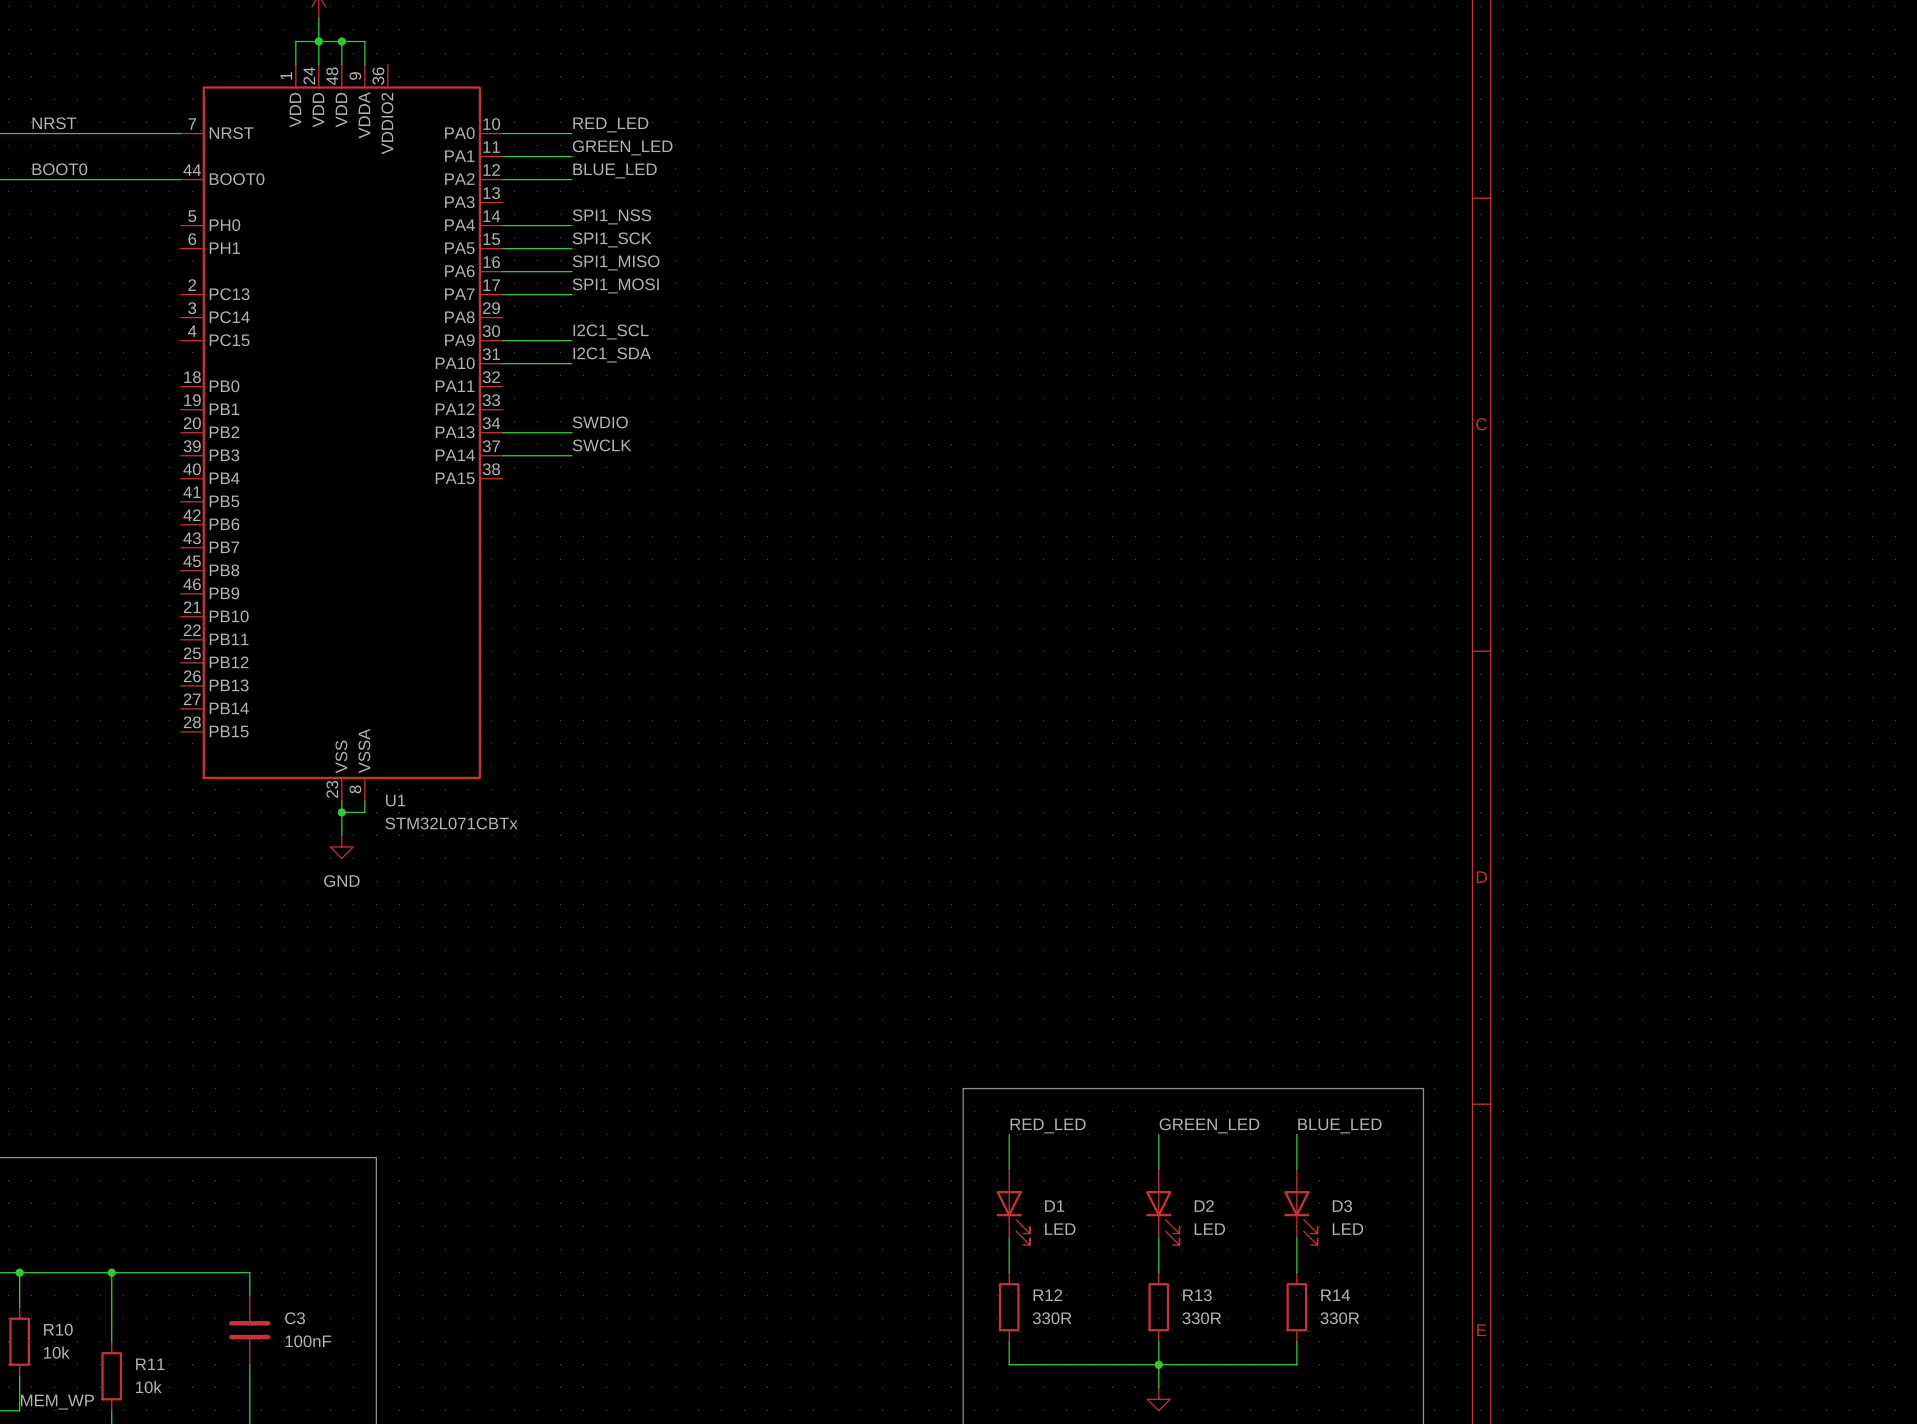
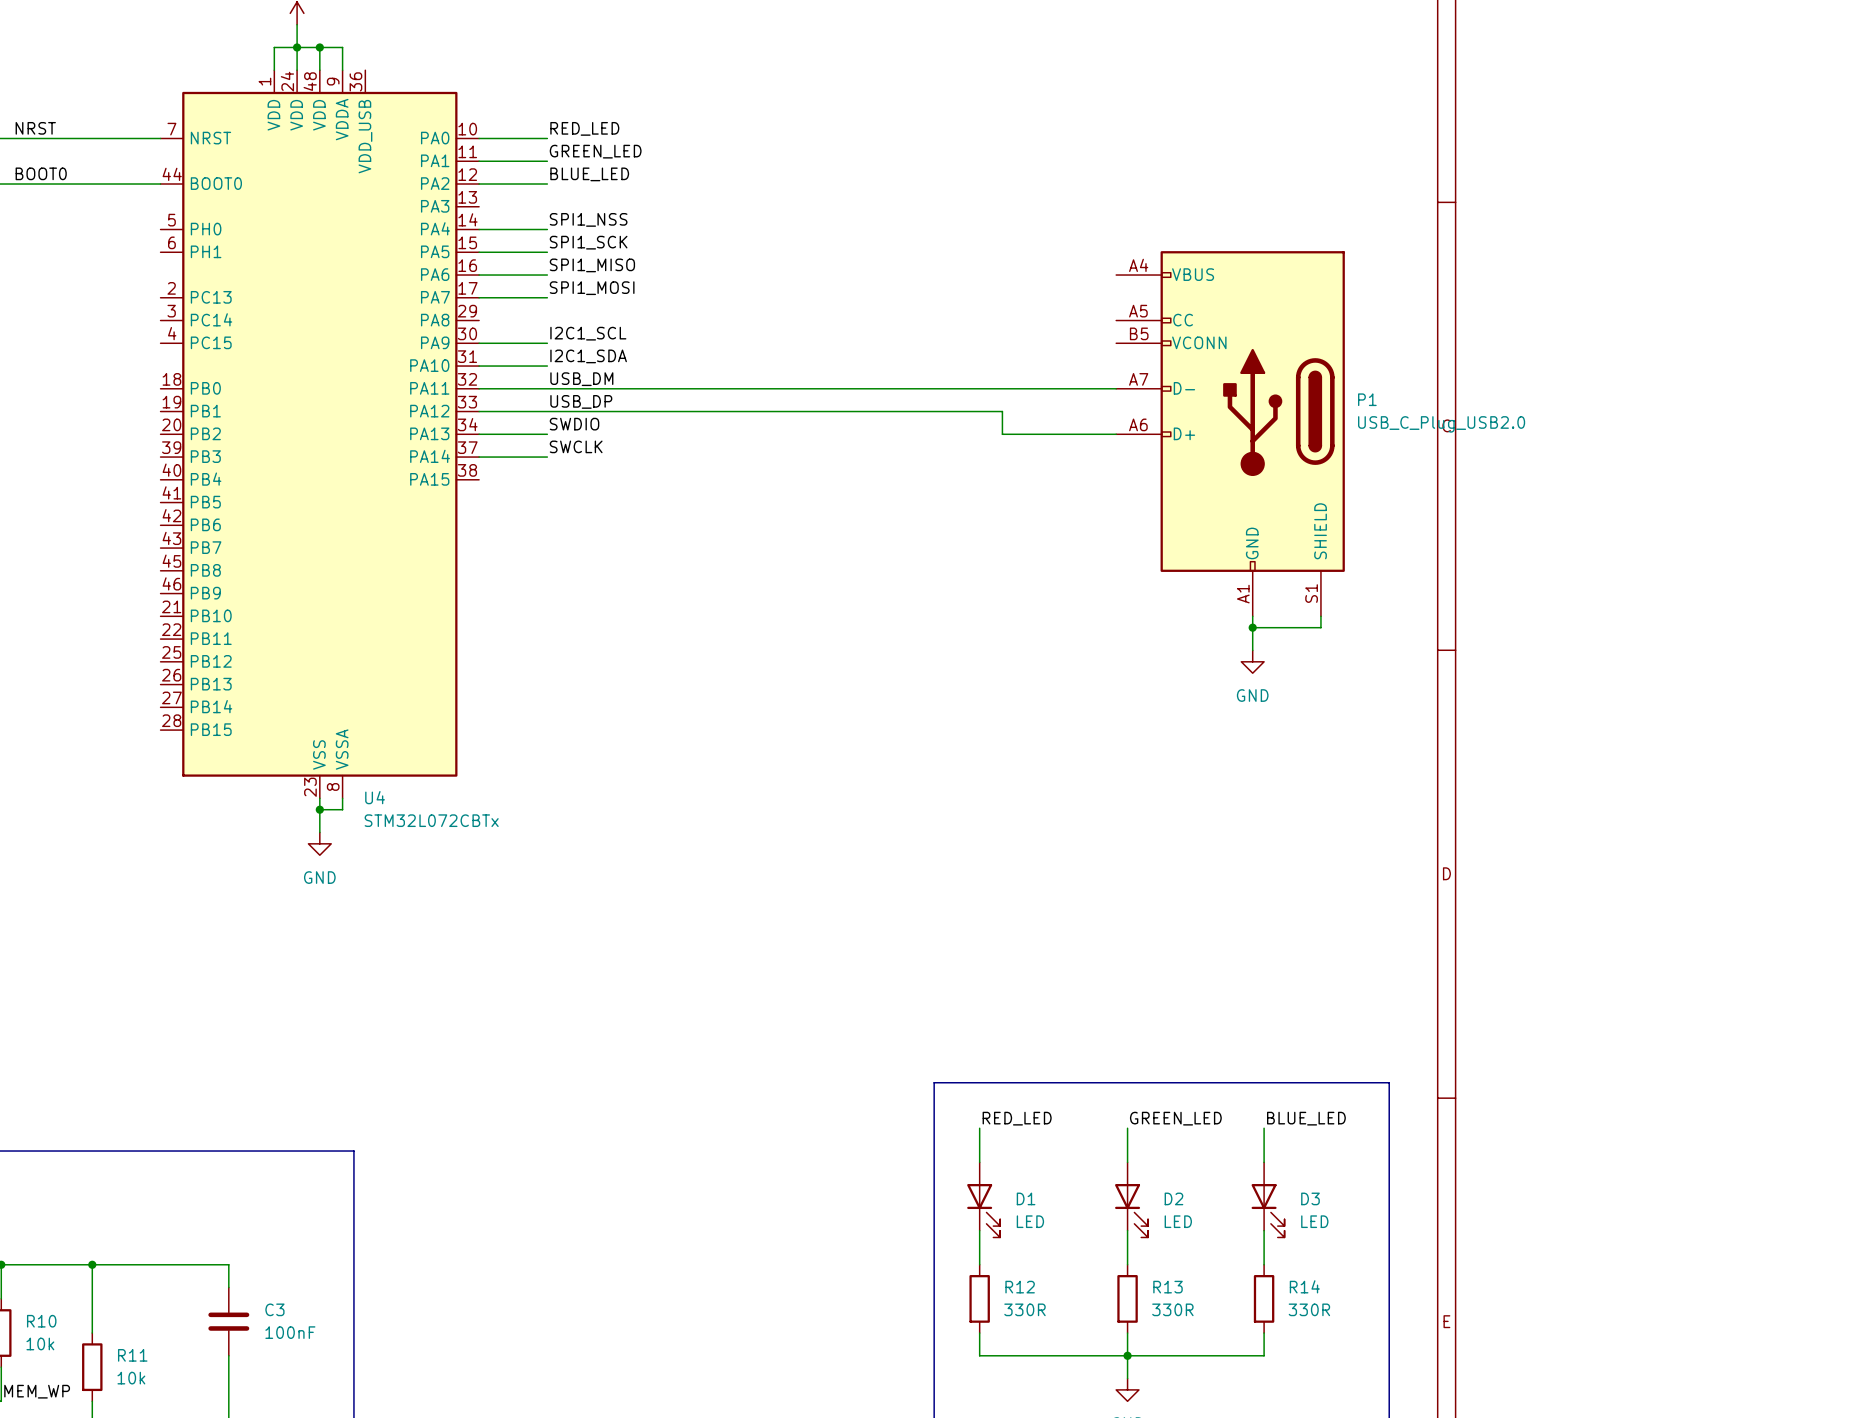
U1 pin name: VDDIO2 (387, 123) -> VDD_USB (365, 136)
label: none -> USB_DM (581, 379)
wire: none -> (479, 388) (1116, 388)
label: none -> USB_DP (581, 401)
wire: none -> (479, 411) (1002, 411) (1002, 434) (1116, 434)
P1: none -> USB_C_Plug_USB2.0 (1230, 433)
wire: none -> (1252, 616) (1252, 650)
wire: none -> (1320, 616) (1320, 627) (1252, 627)
junction: none -> (1252, 627)
power symbol: none -> GND (1252, 661)
U1 name: U1 (395, 800) -> U4 (375, 797)
U1 value: STM32L071CBTx (451, 823) -> STM32L072CBTx (431, 820)

